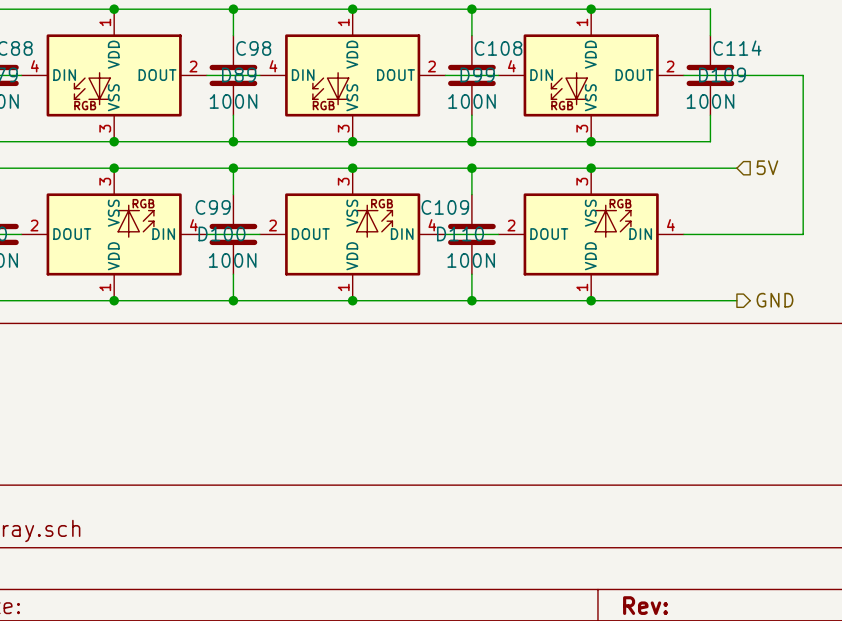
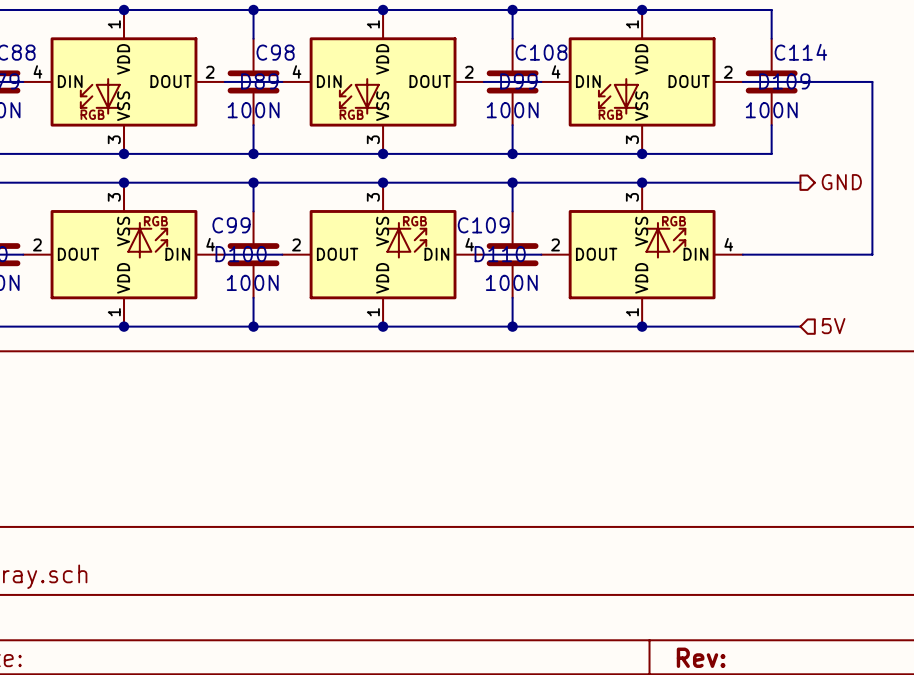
hierarchical label shape: input (767, 167) -> output (841, 182)
hierarchical label: 5V (767, 167) -> GND (841, 182)
hierarchical label shape: output (774, 300) -> input (833, 326)
hierarchical label: GND (774, 300) -> 5V (833, 326)

